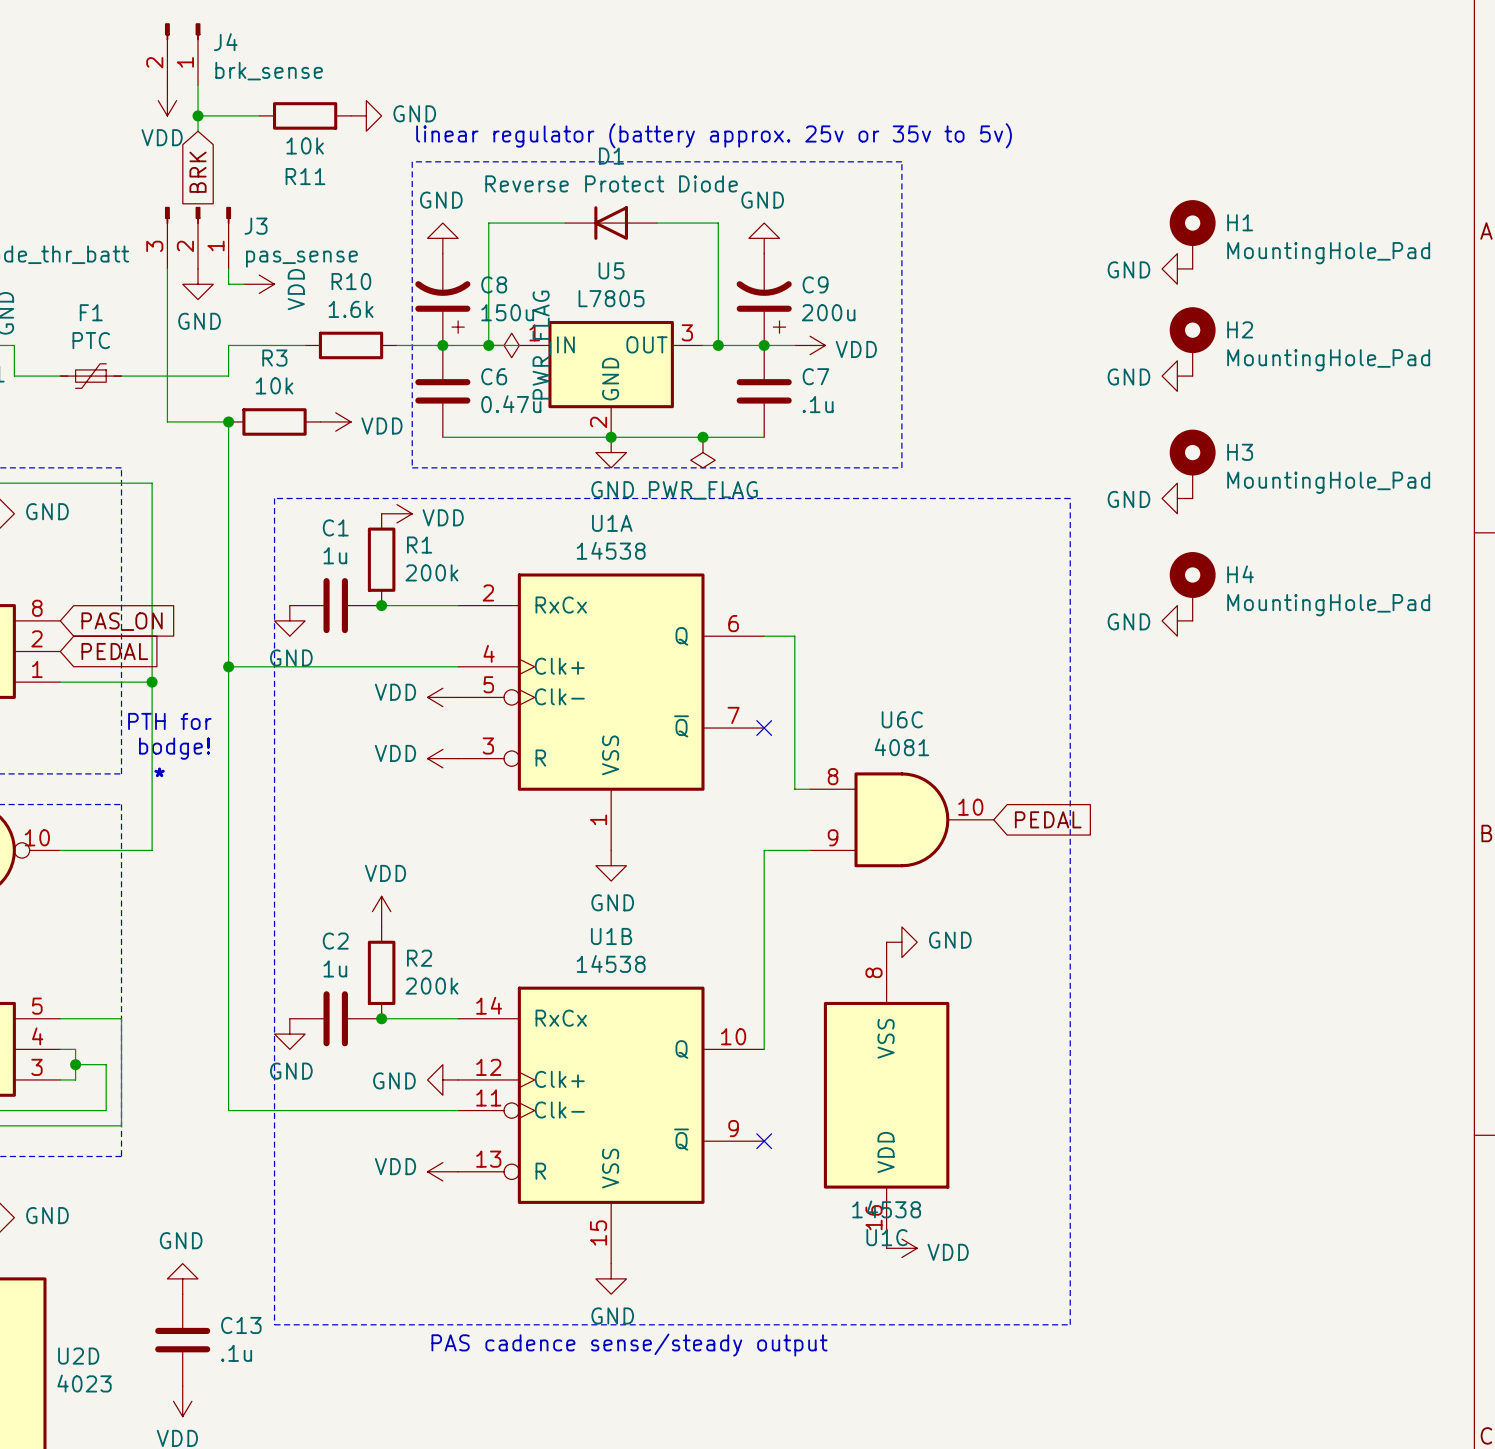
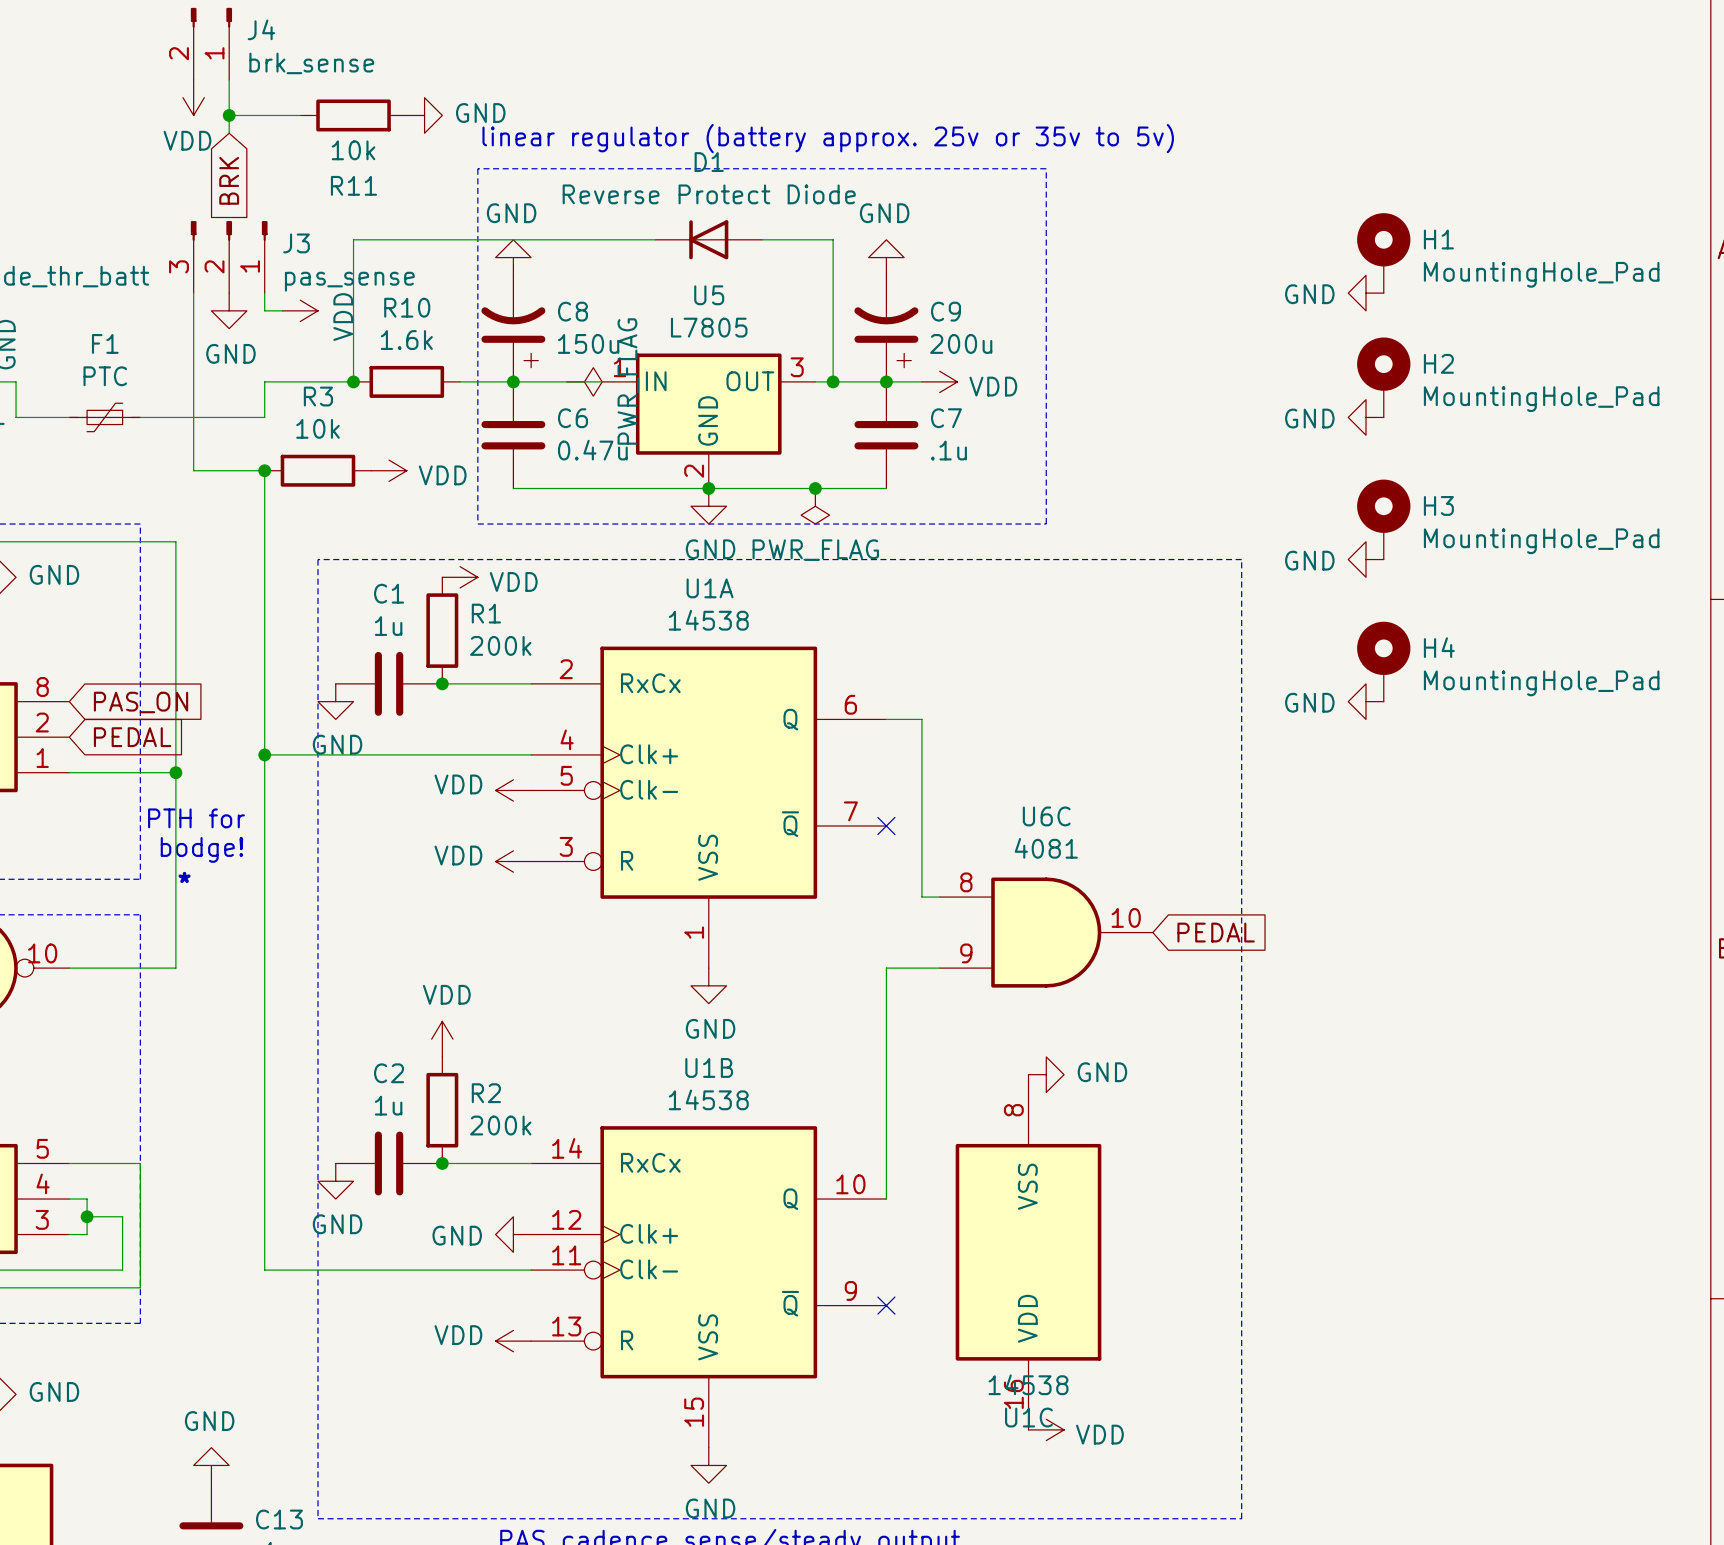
wire: (488, 223) (488, 345) -> (566, 239) (353, 239) (353, 381)
junction: none -> (353, 381)
junction: (488, 345) -> none

